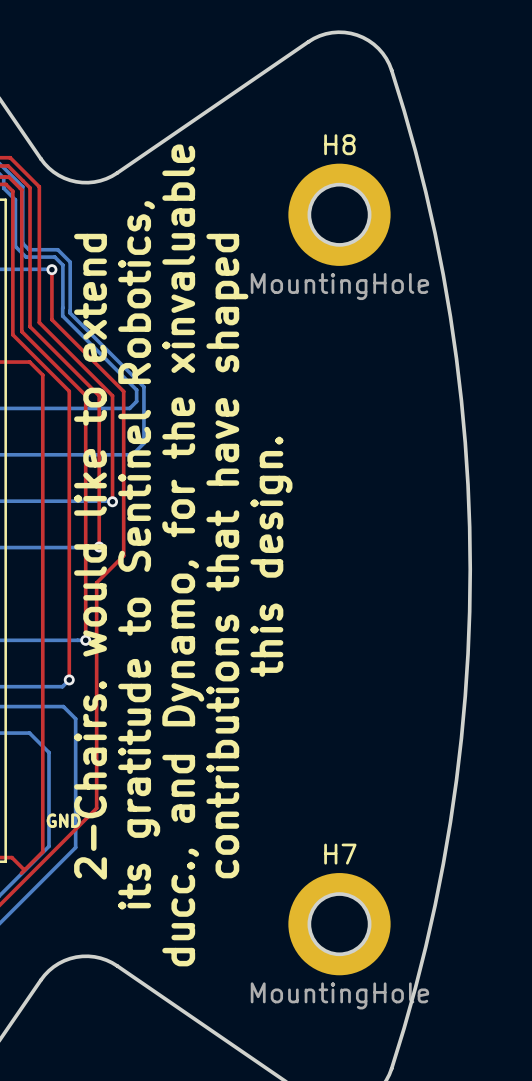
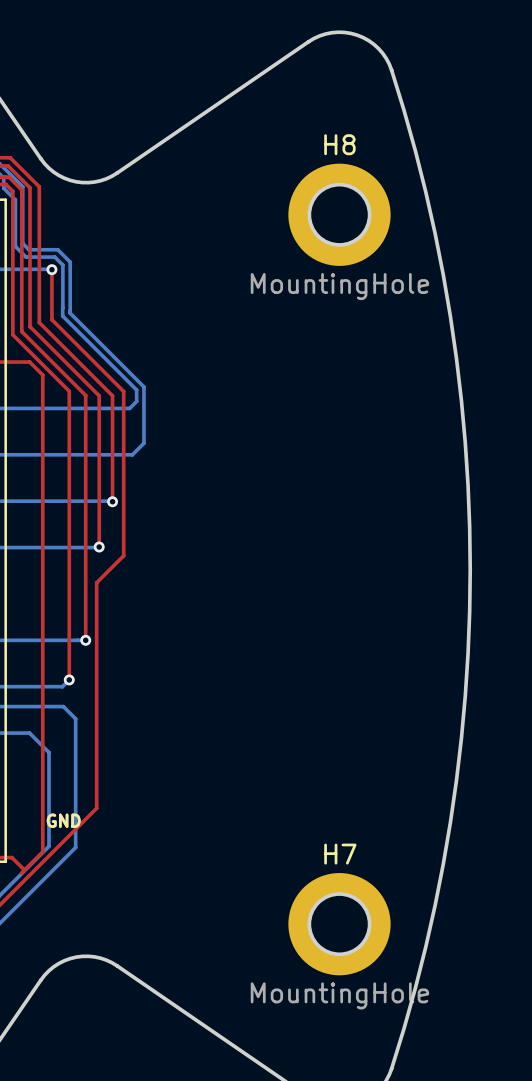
text: its gratitude to Sentinel Robotics, (139, 555) -> none
text: ducc., and Dynamo, for the xinvaluable (183, 555) -> none
text: 2-Chairs. would like to extend (90, 556) -> none
text: contributions that have shaped (227, 556) -> none
text: this design. (271, 556) -> none

